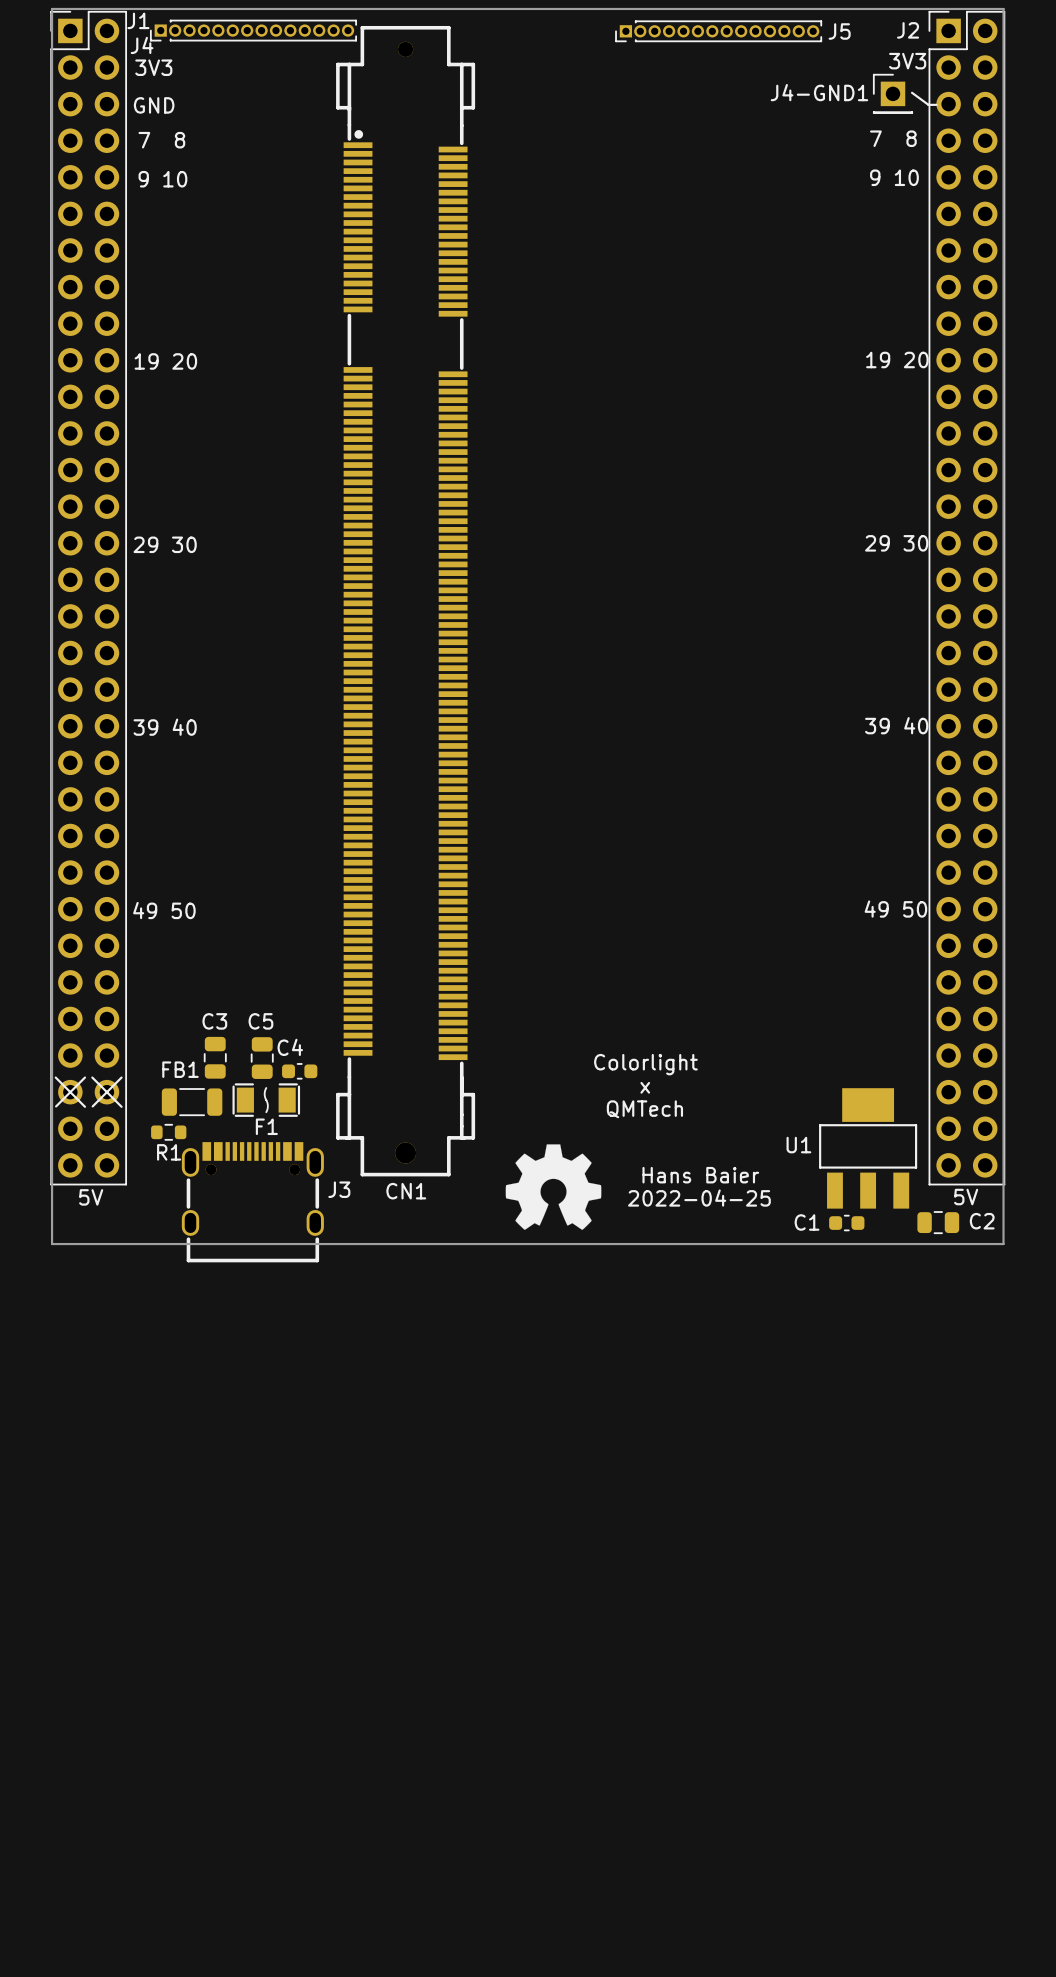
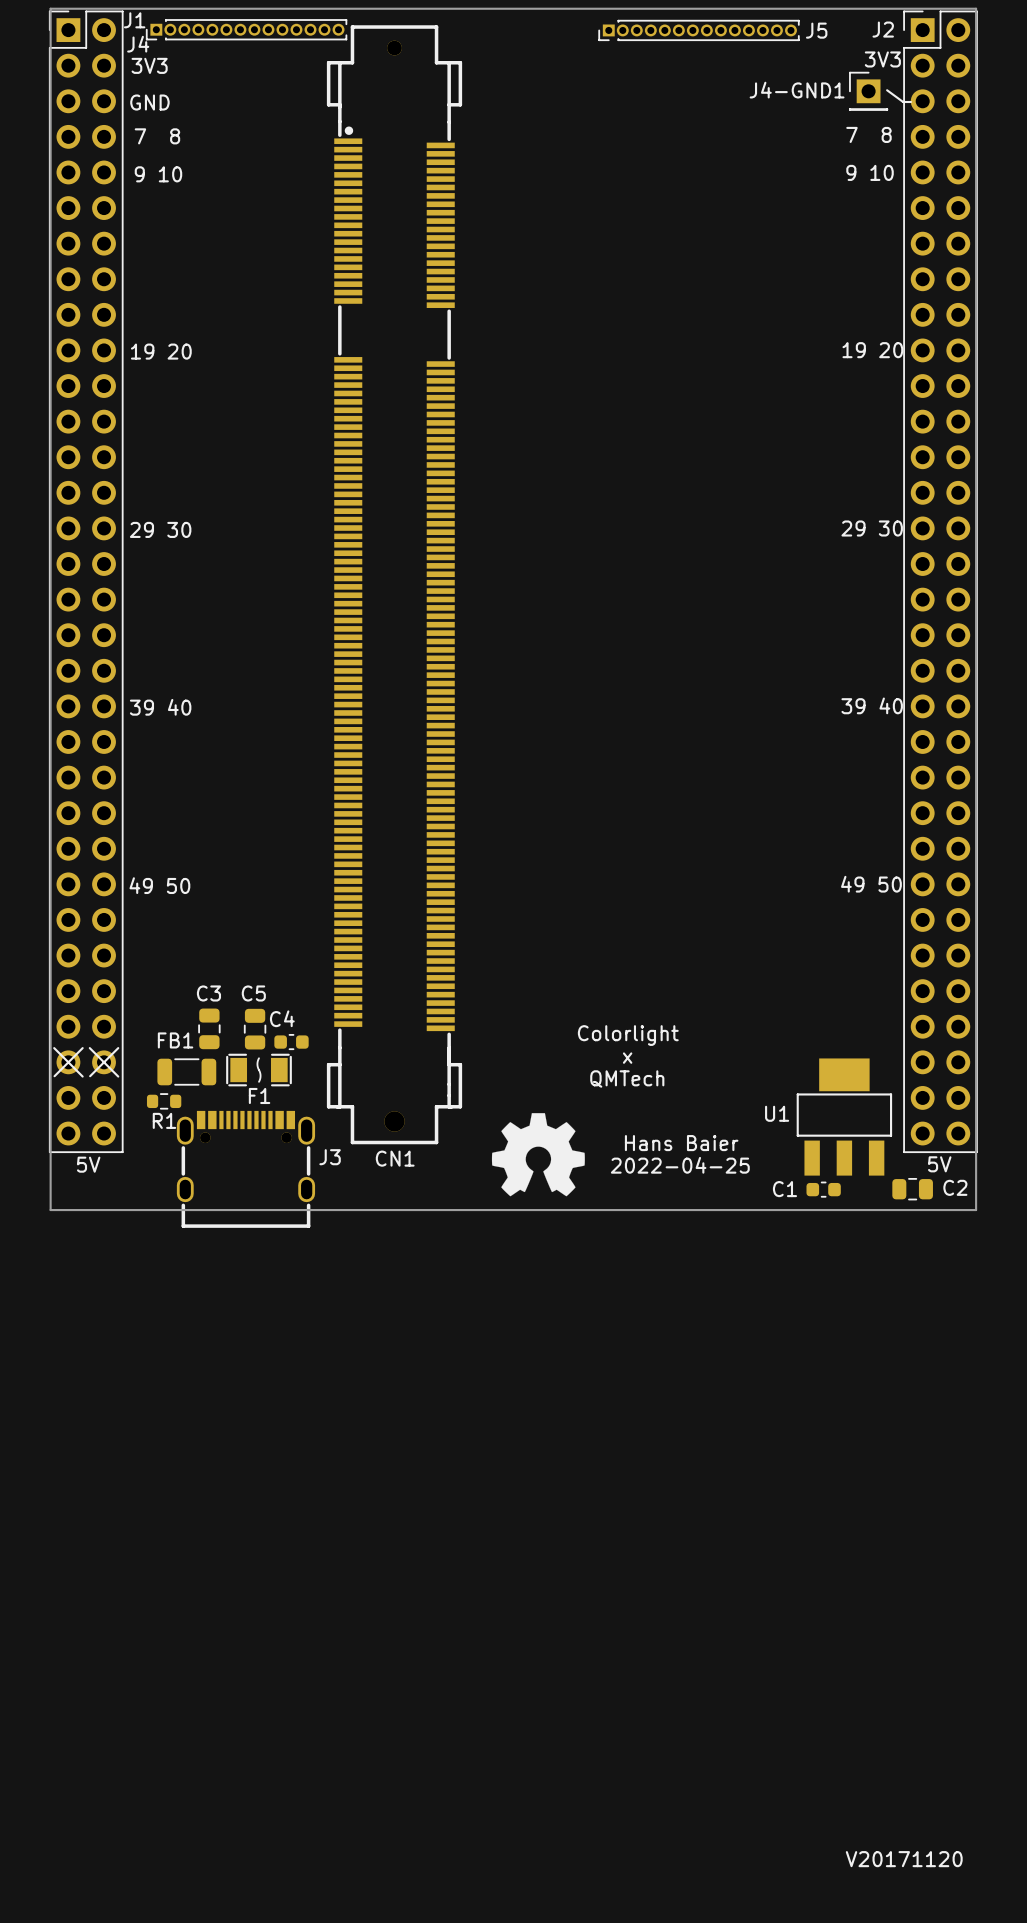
drawing: none -> [845, 1851, 963, 1868]

